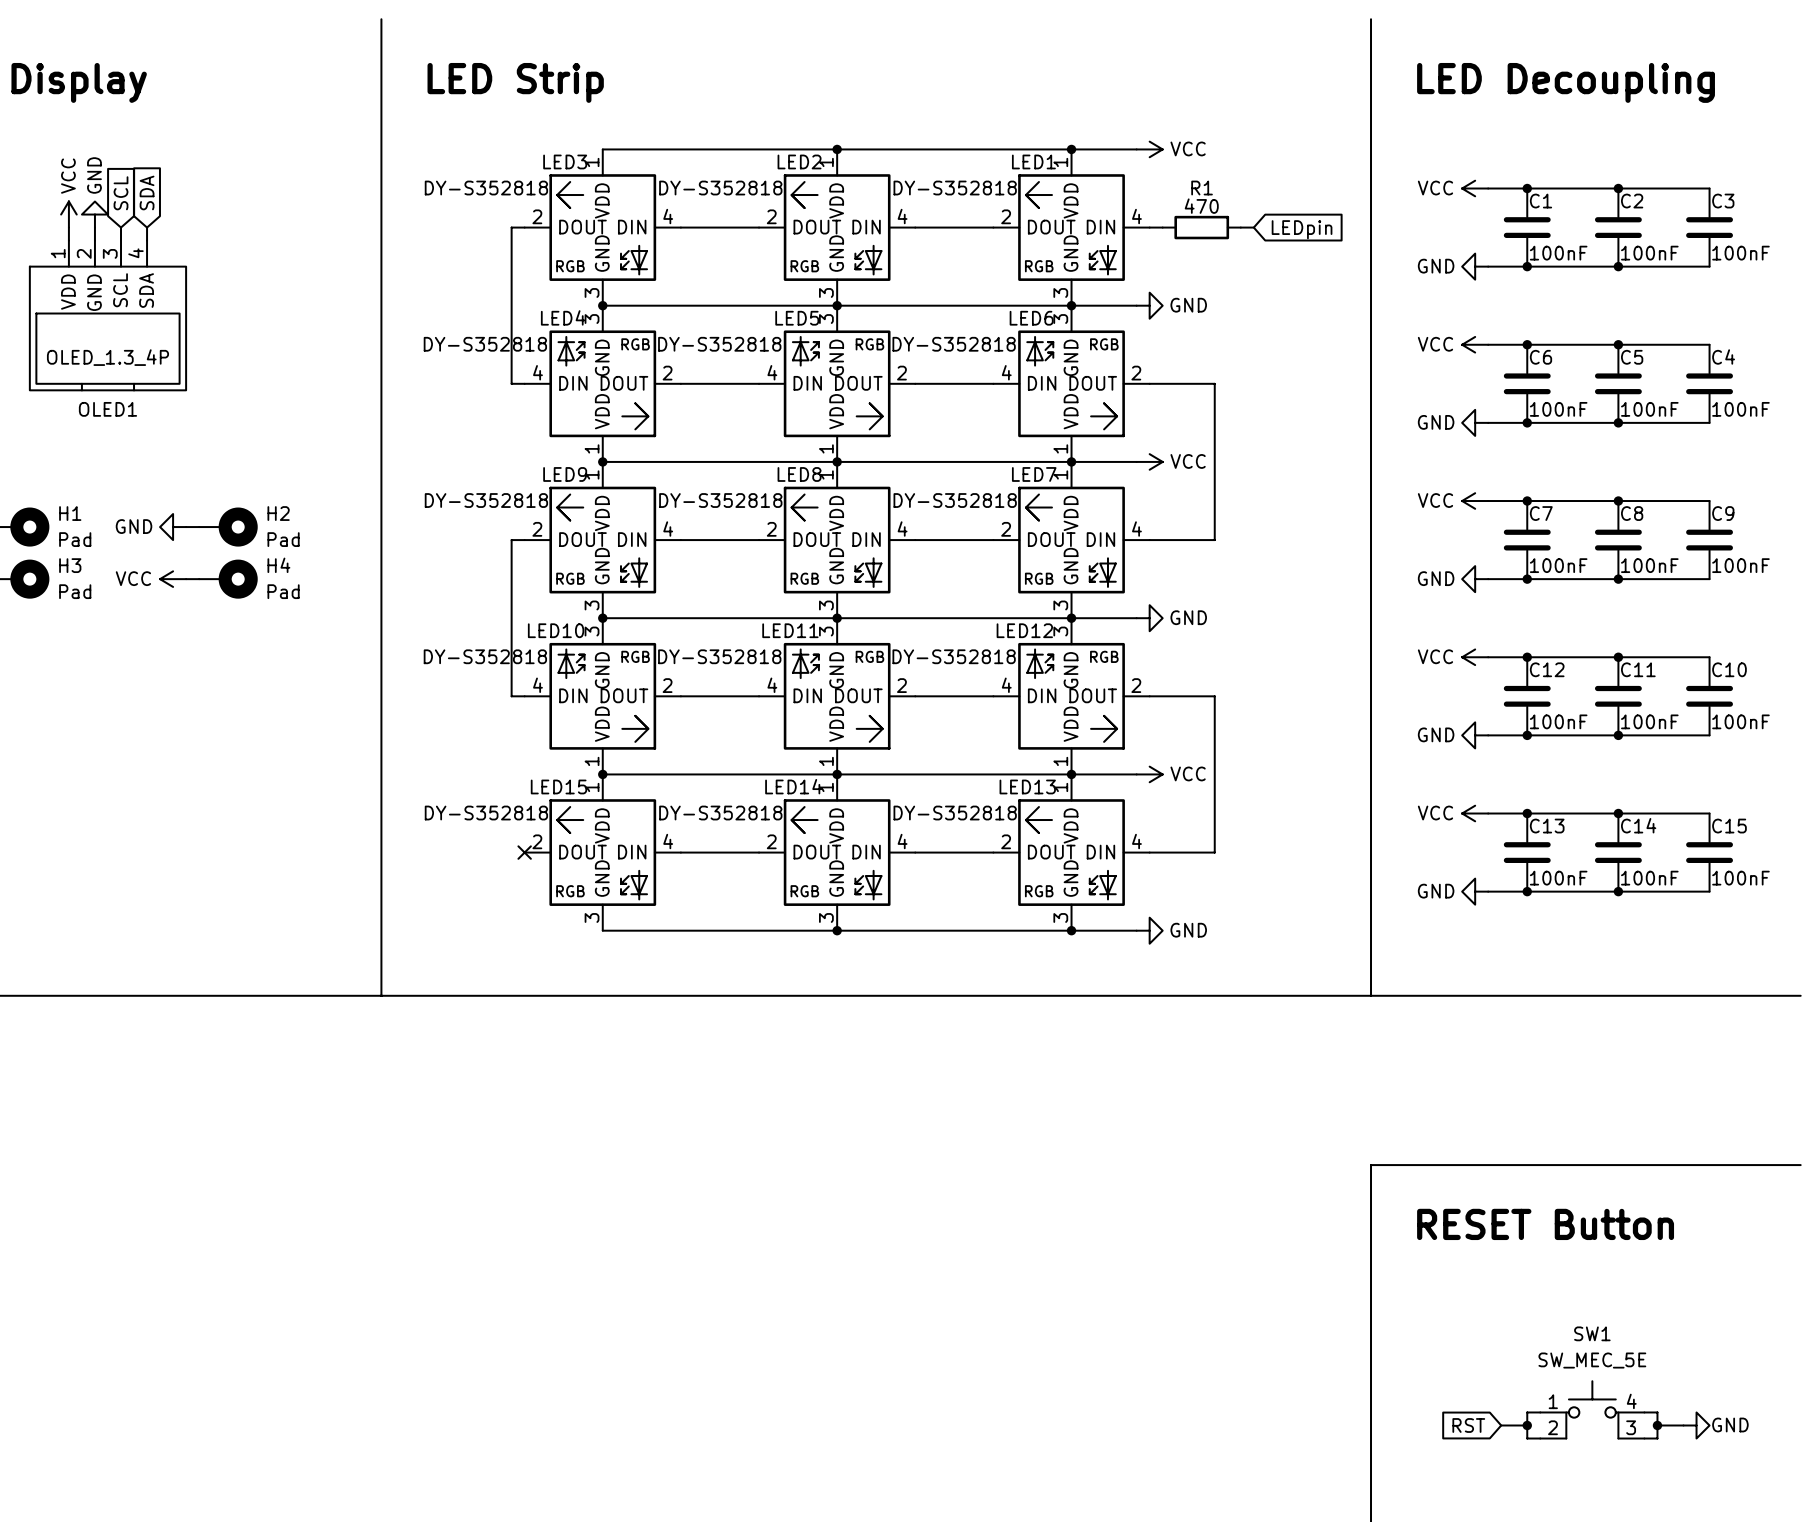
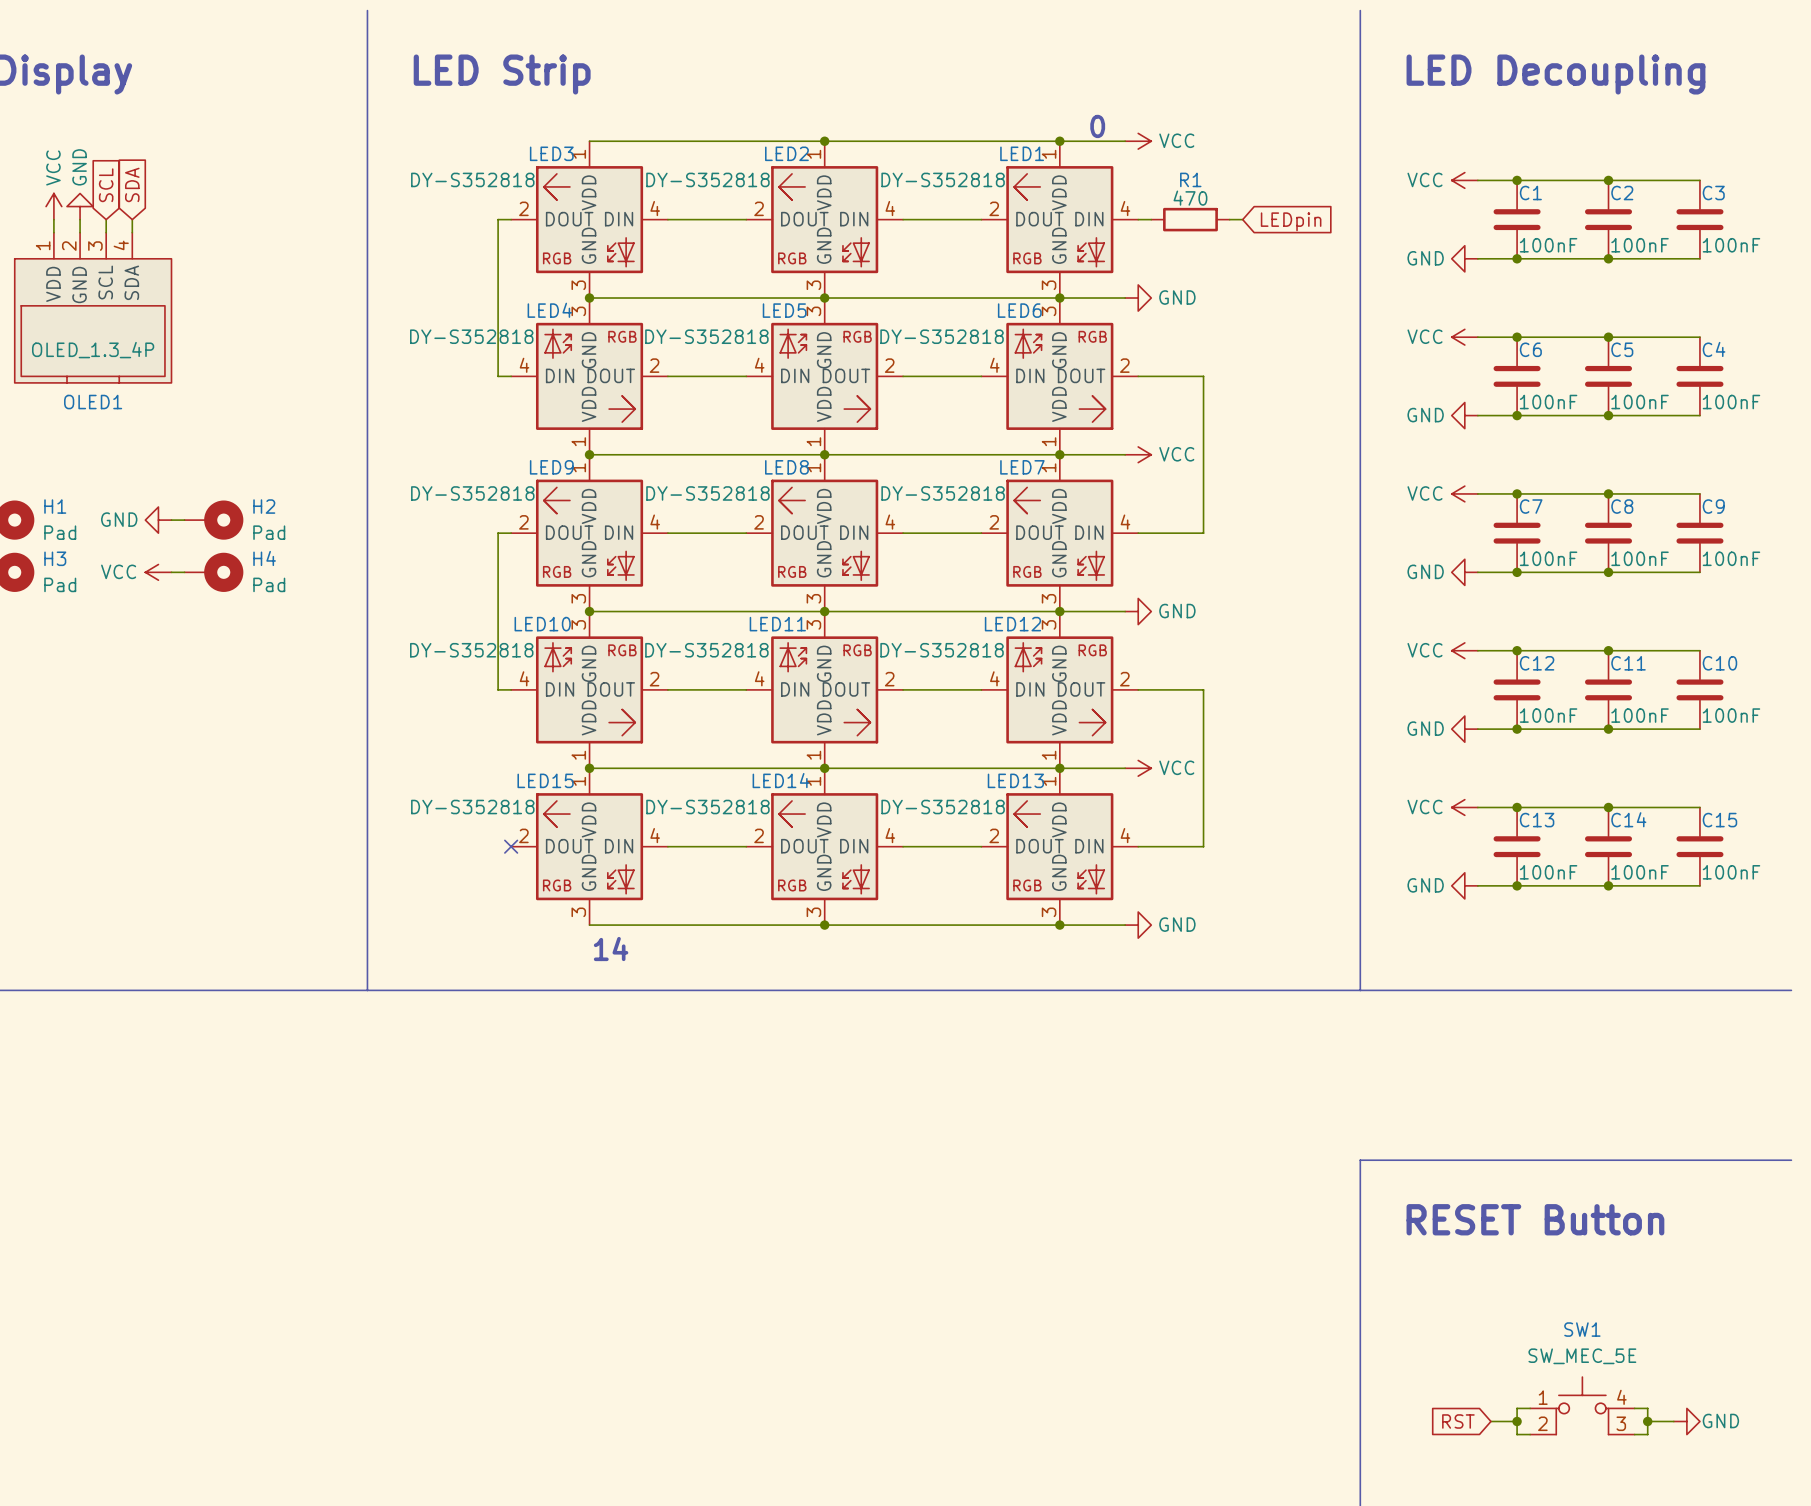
text: none -> 0 (1097, 126)
text: none -> 14 (611, 949)

